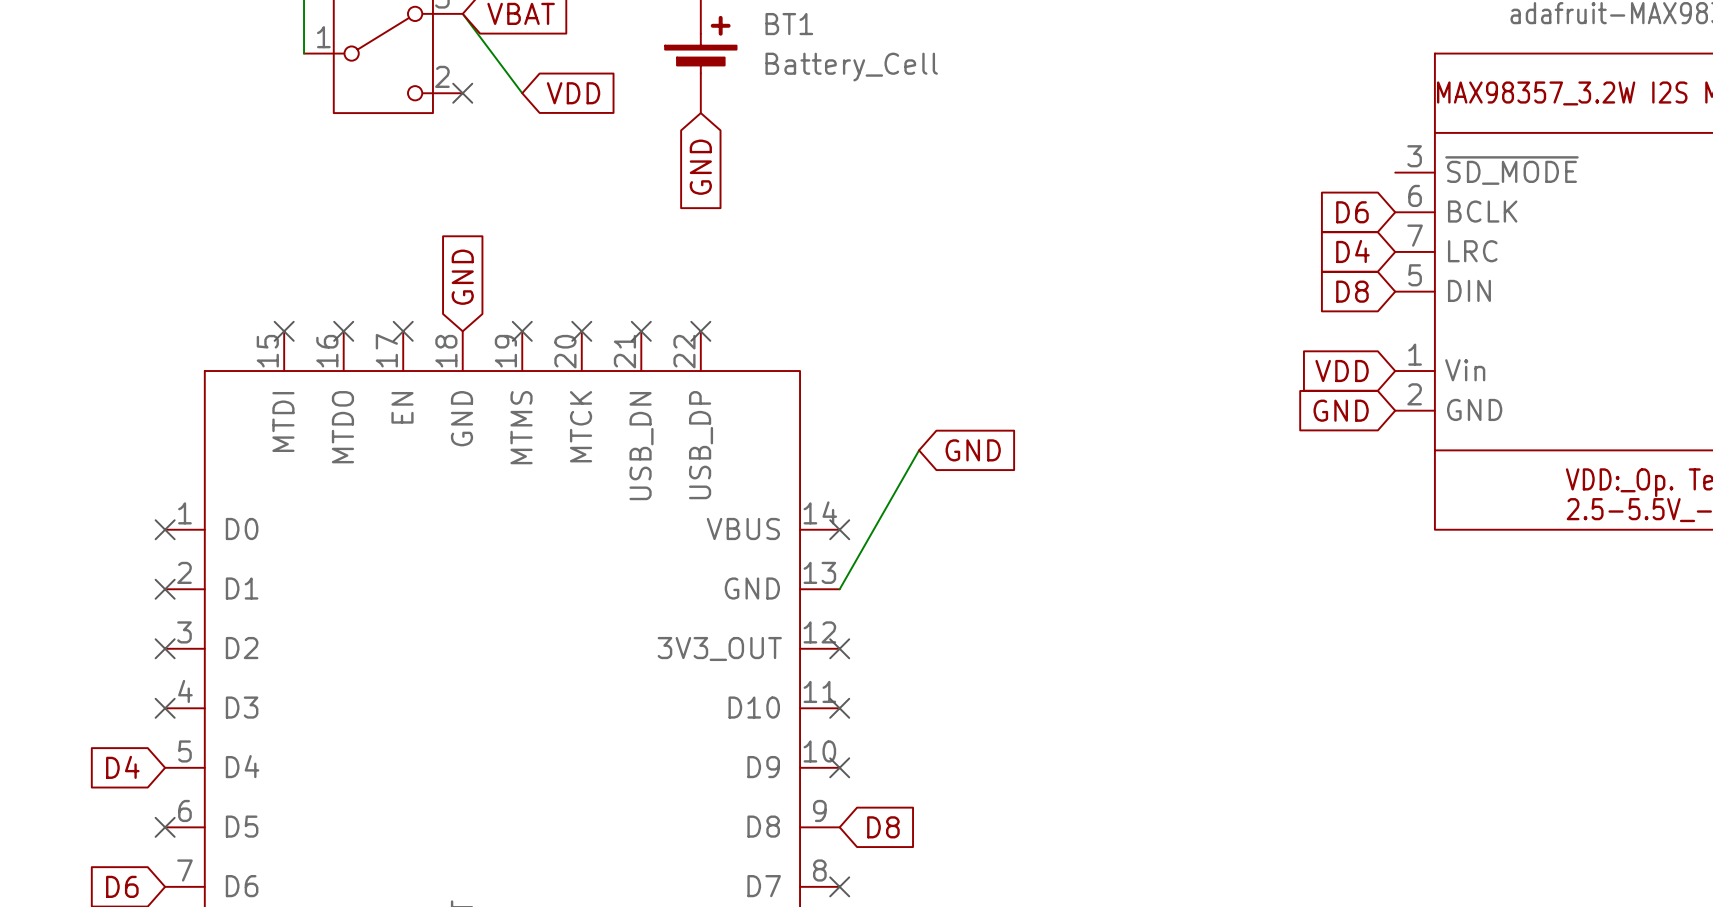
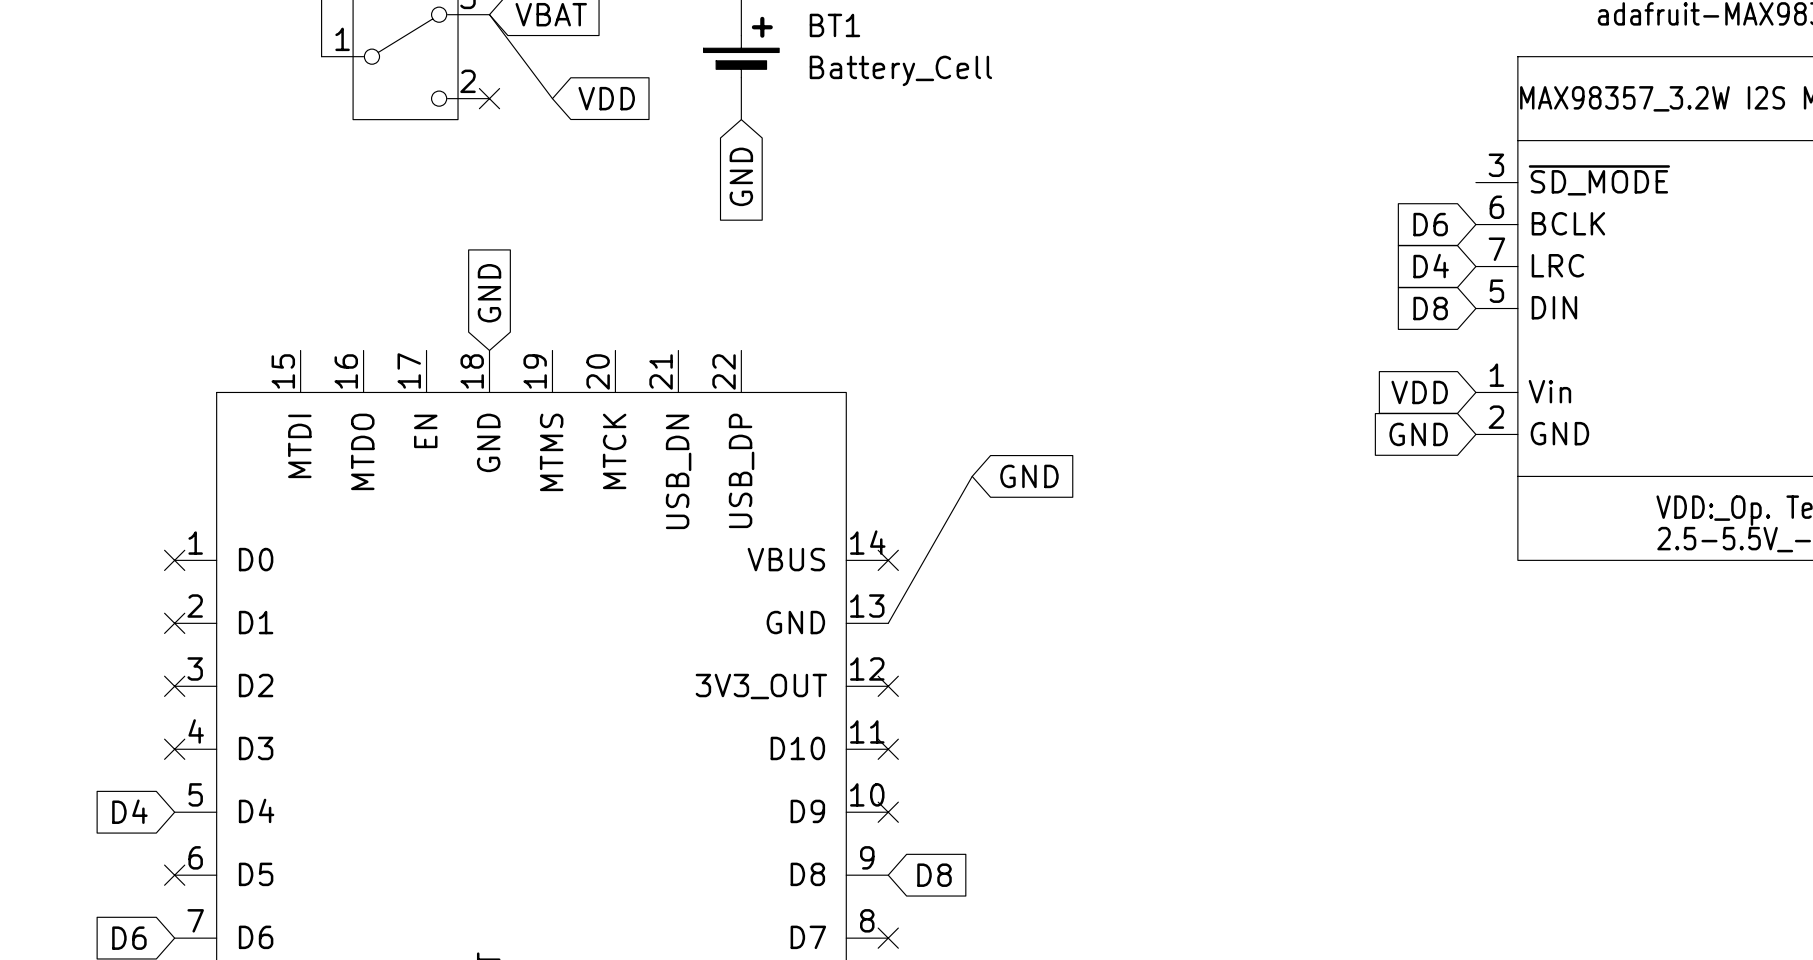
no-connect mark: (284, 331) -> none
no-connect mark: (343, 331) -> none
no-connect mark: (403, 331) -> none
no-connect mark: (522, 331) -> none
no-connect mark: (581, 331) -> none
no-connect mark: (641, 331) -> none
no-connect mark: (700, 331) -> none

